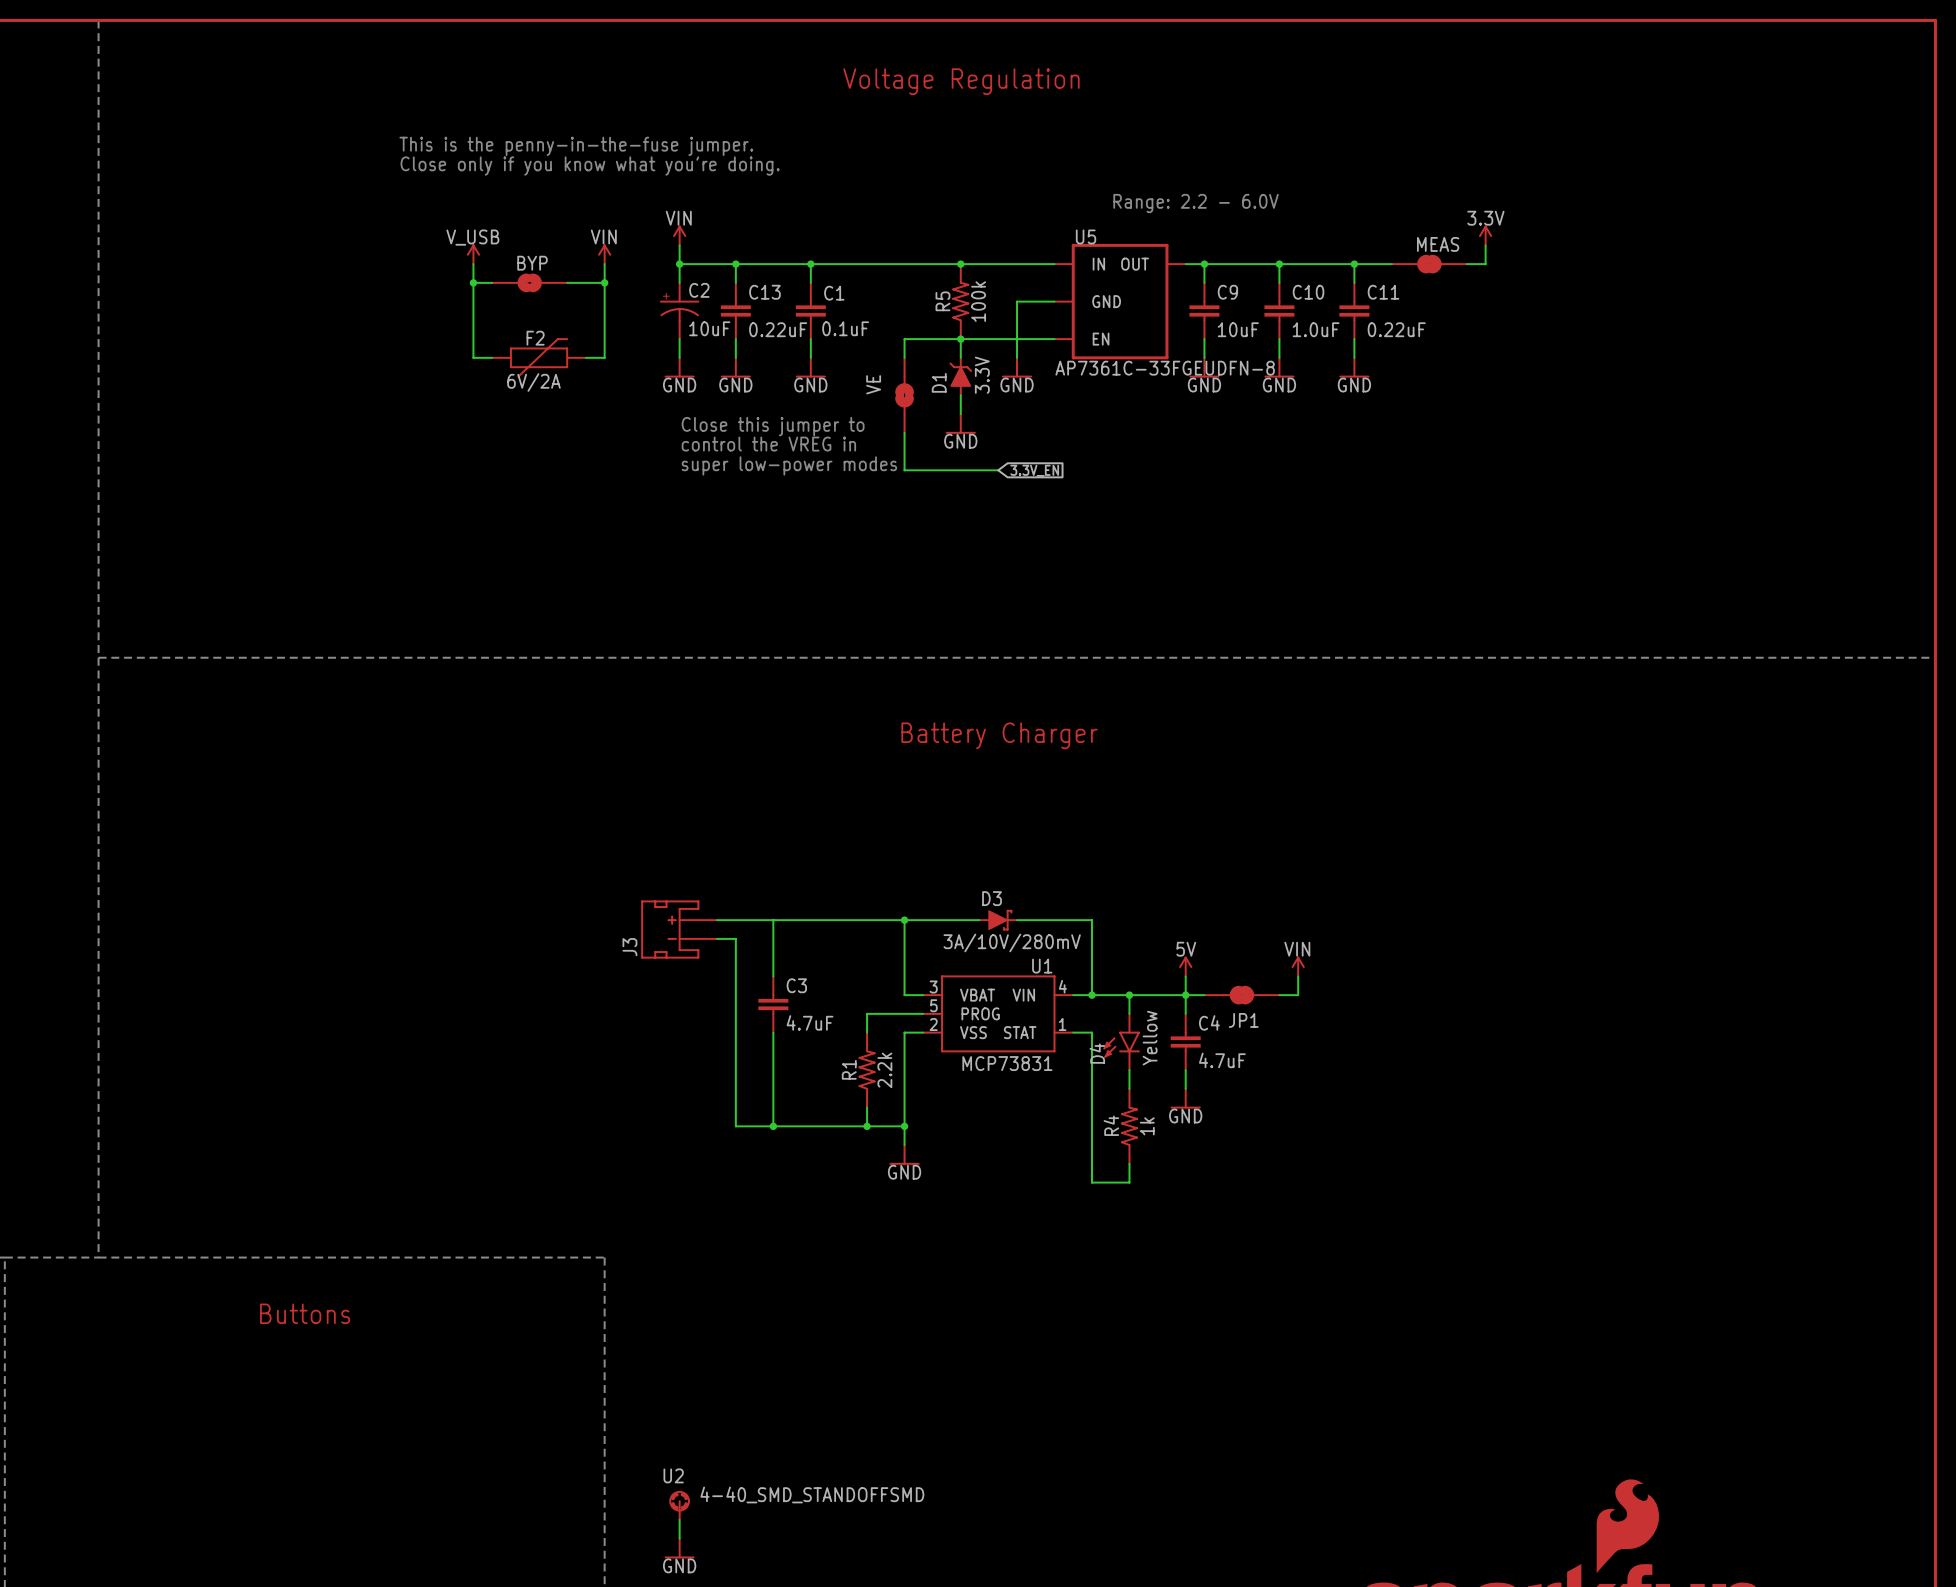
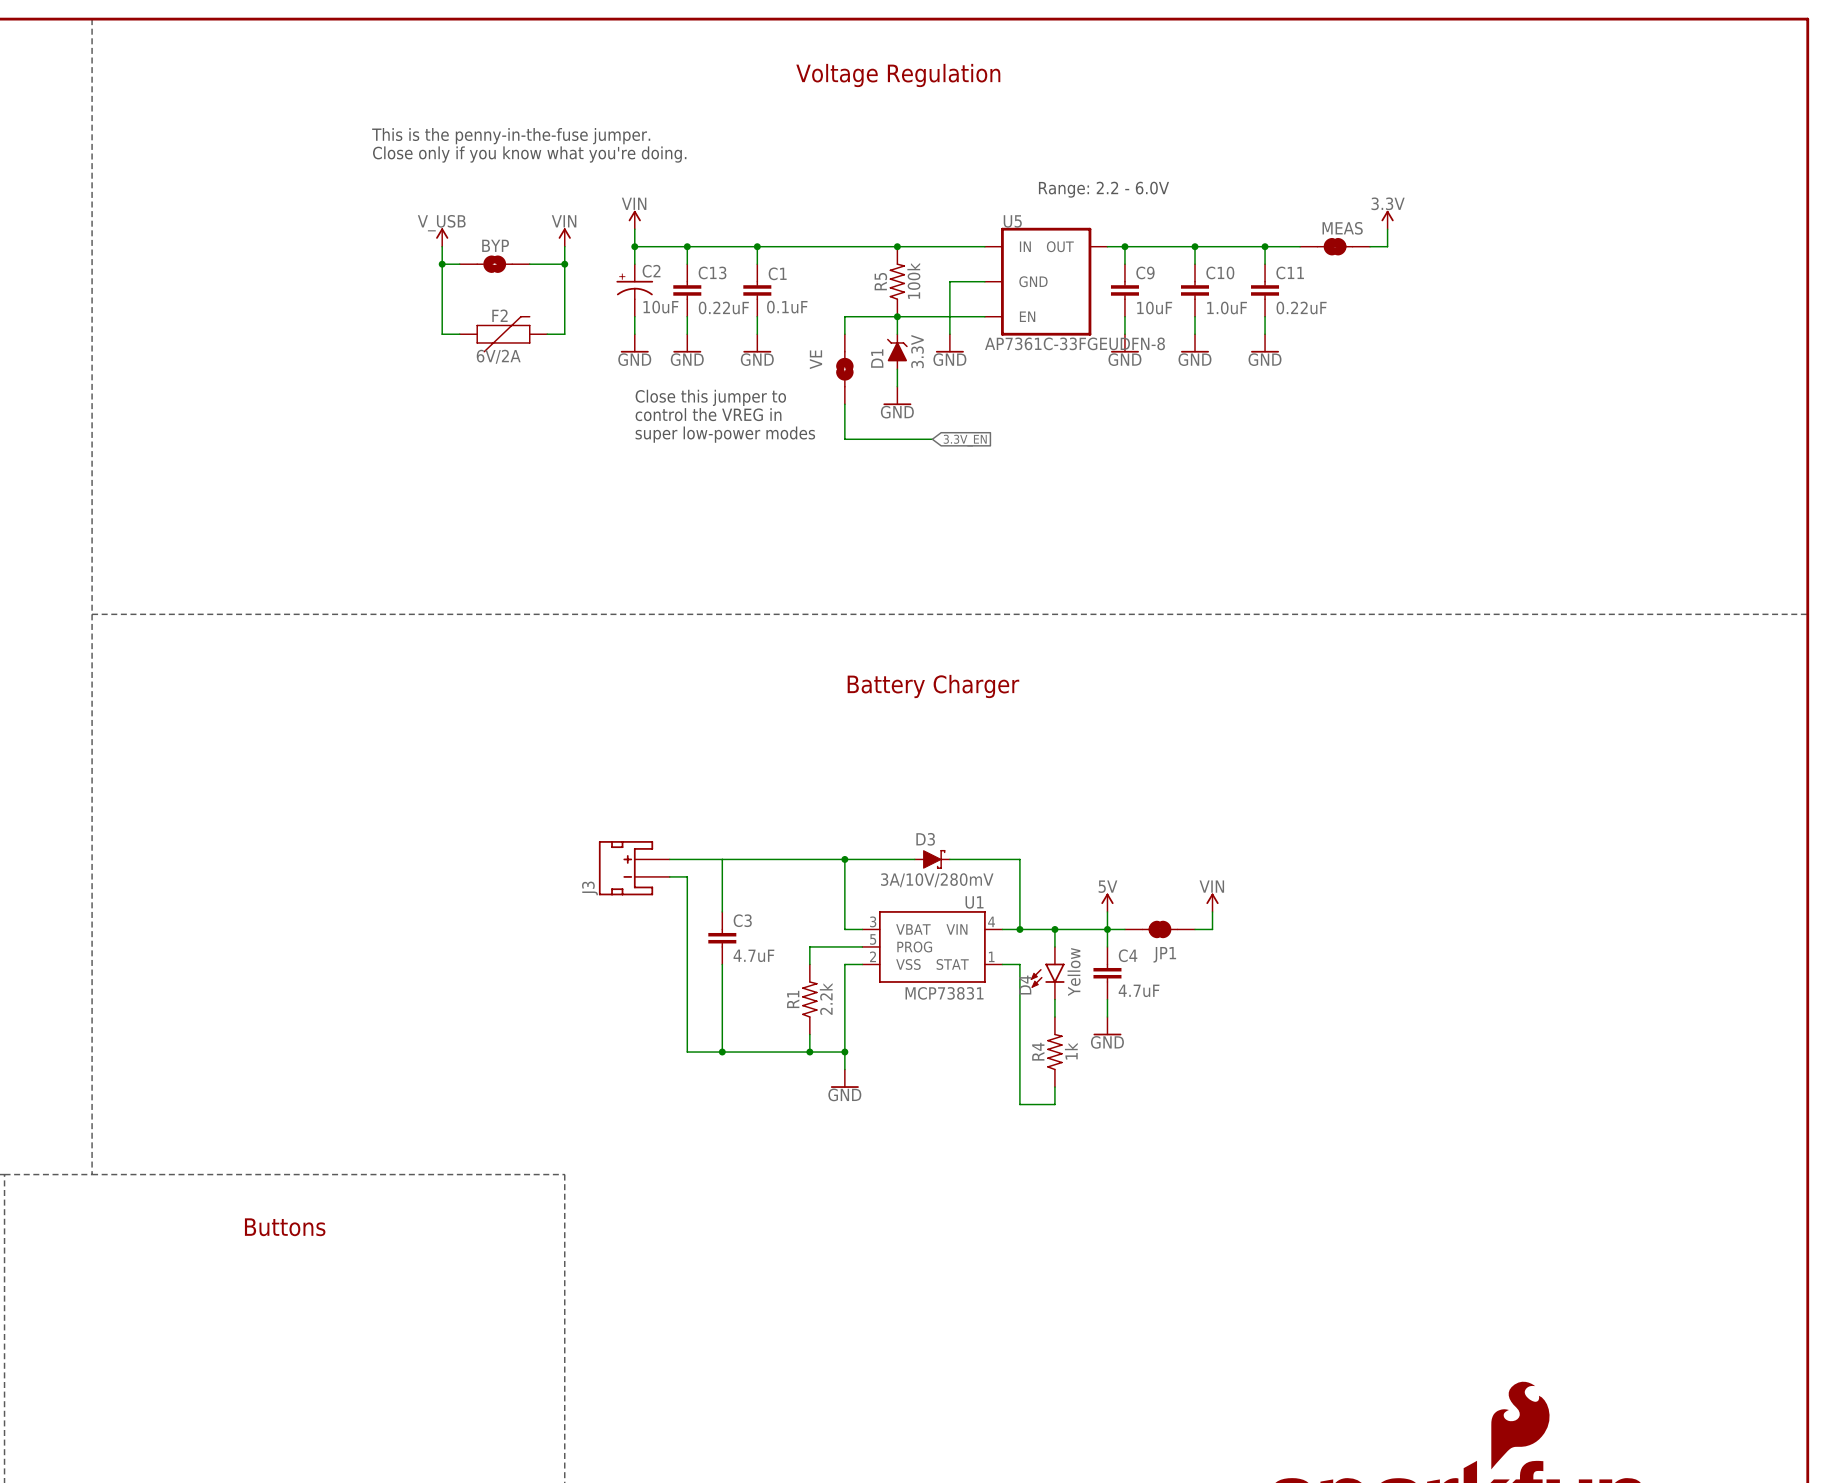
U2: 4-40_SMD_STANDOFFSMD (679, 1505) -> none
wire: (679, 1519) (679, 1538) -> none
power symbol: GND (679, 1548) -> none

